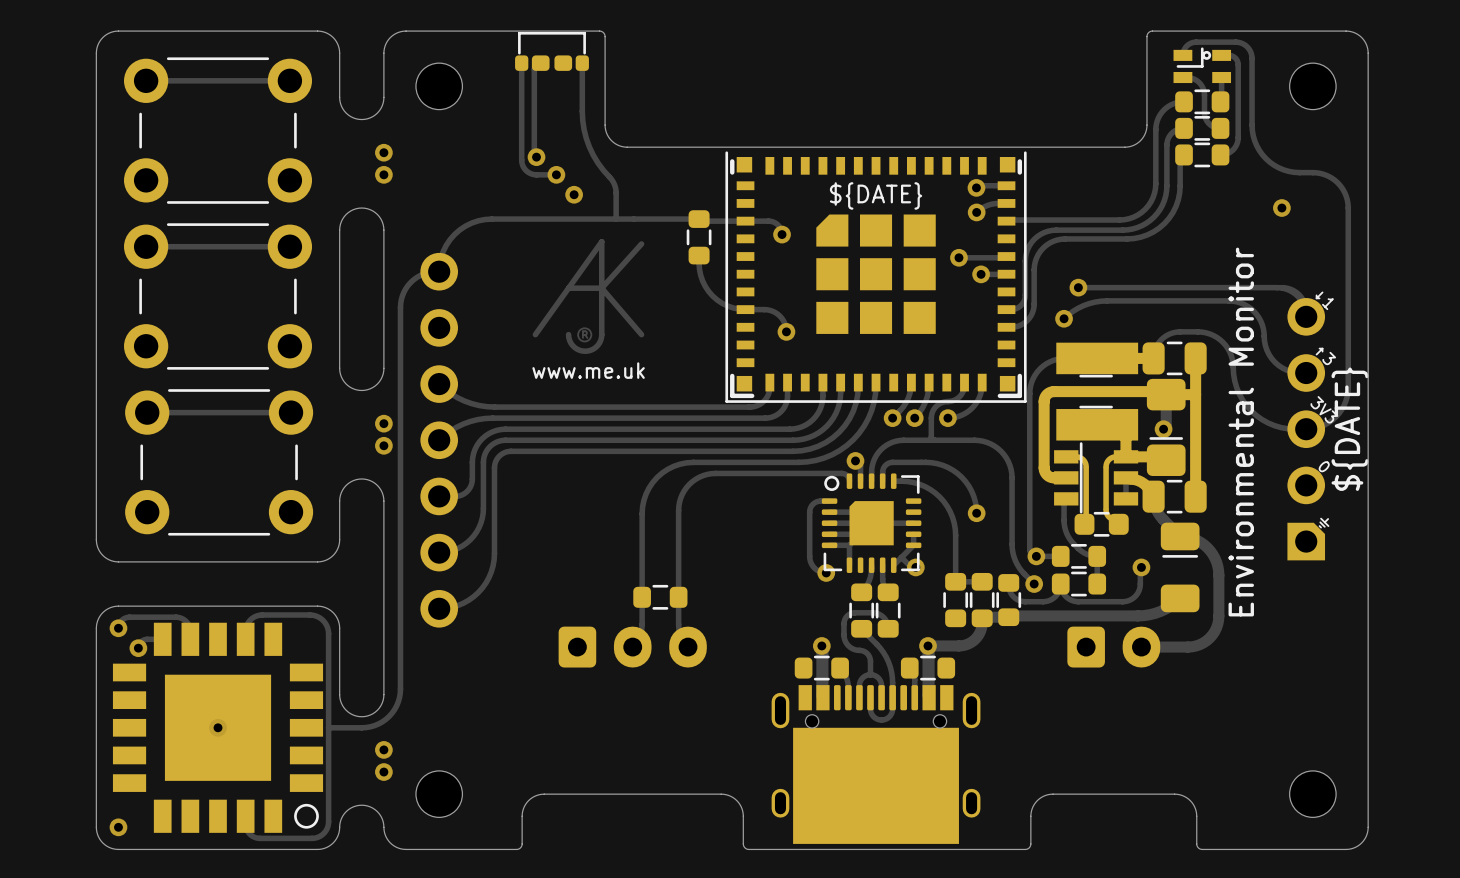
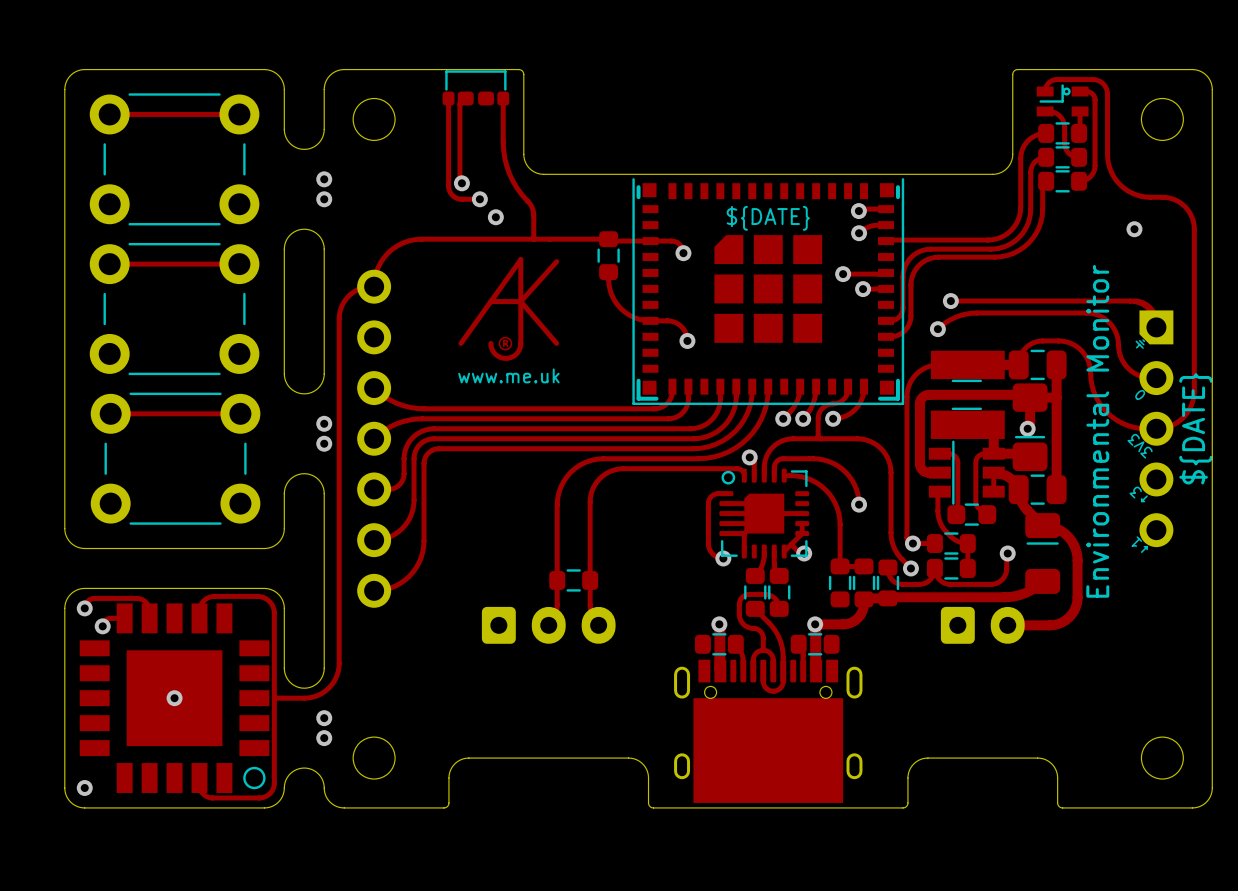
part rotation: 0° (1306, 429) -> 180° (1156, 428)

